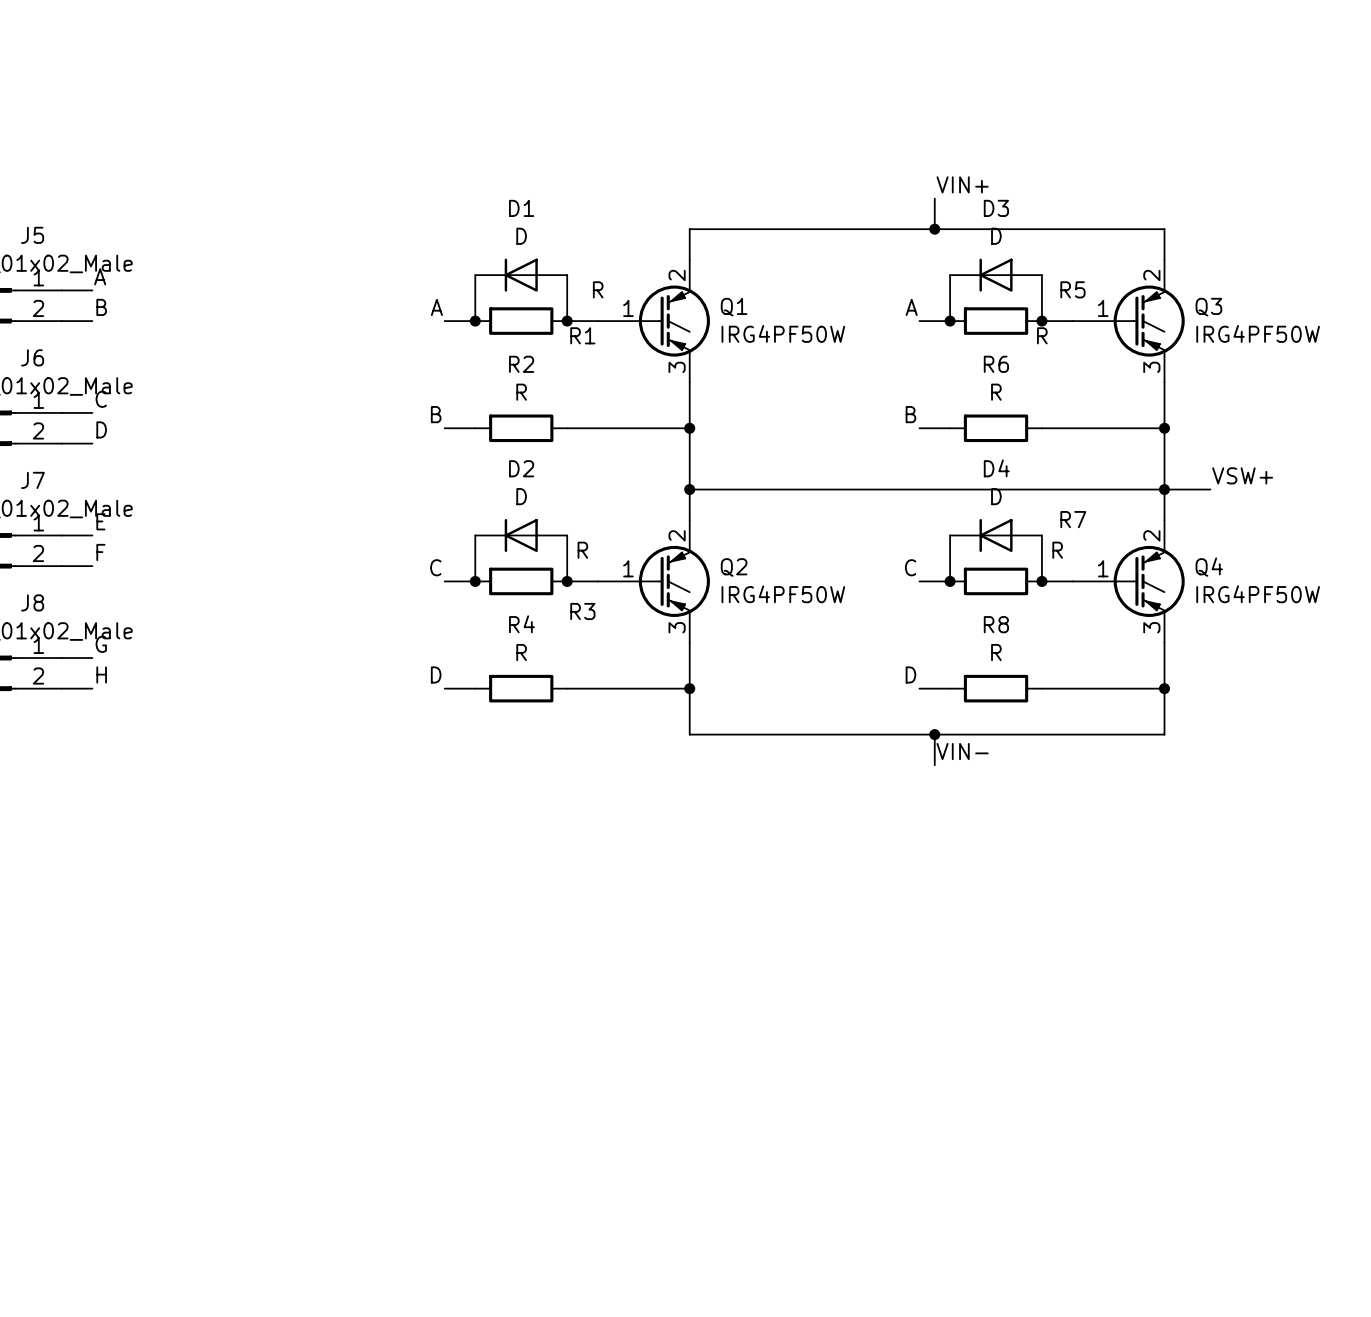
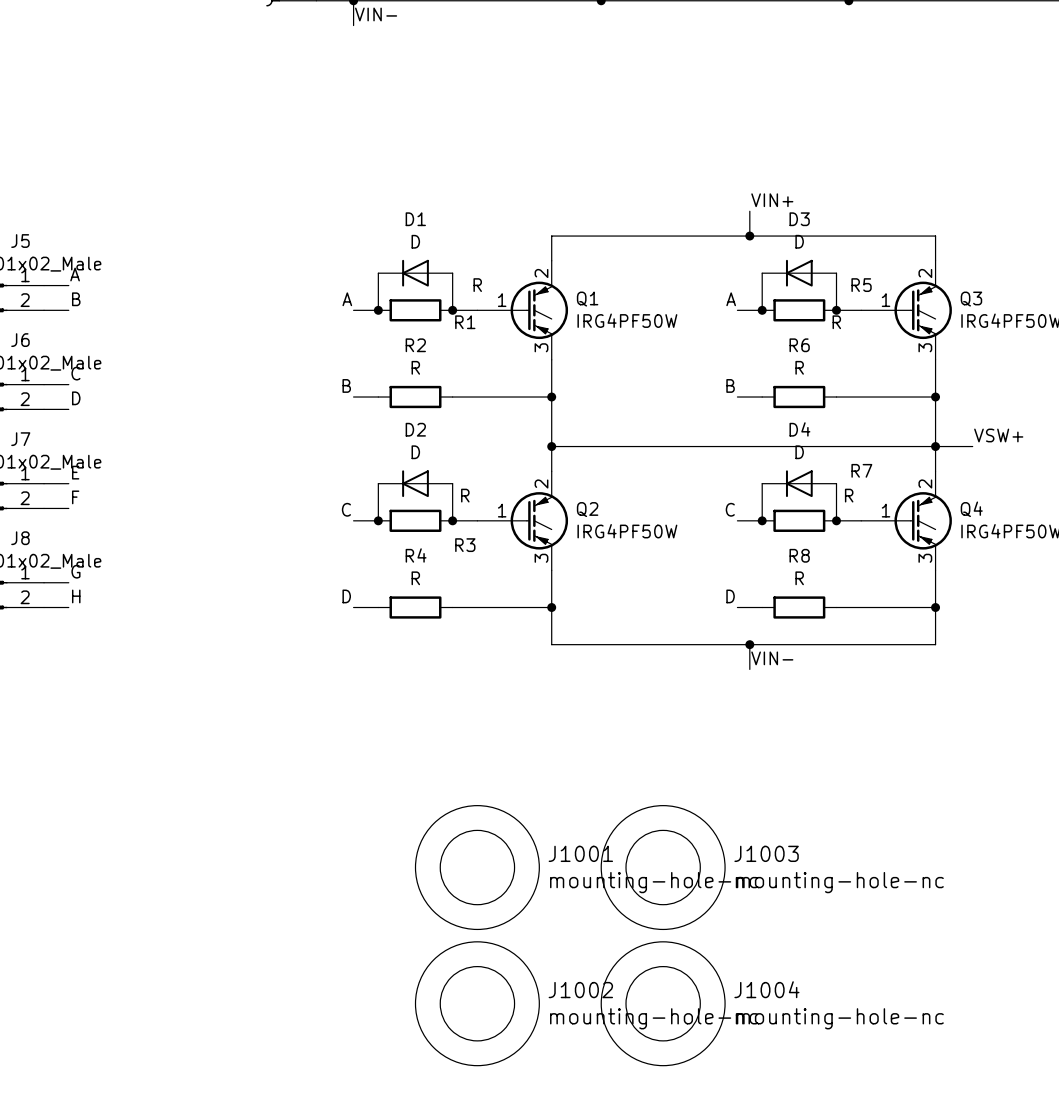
J1001: none -> mounting-hole-nc (477, 867)
J1003: none -> mounting-hole-nc (663, 867)
J1002: none -> mounting-hole-nc (477, 1003)
J1004: none -> mounting-hole-nc (663, 1003)

